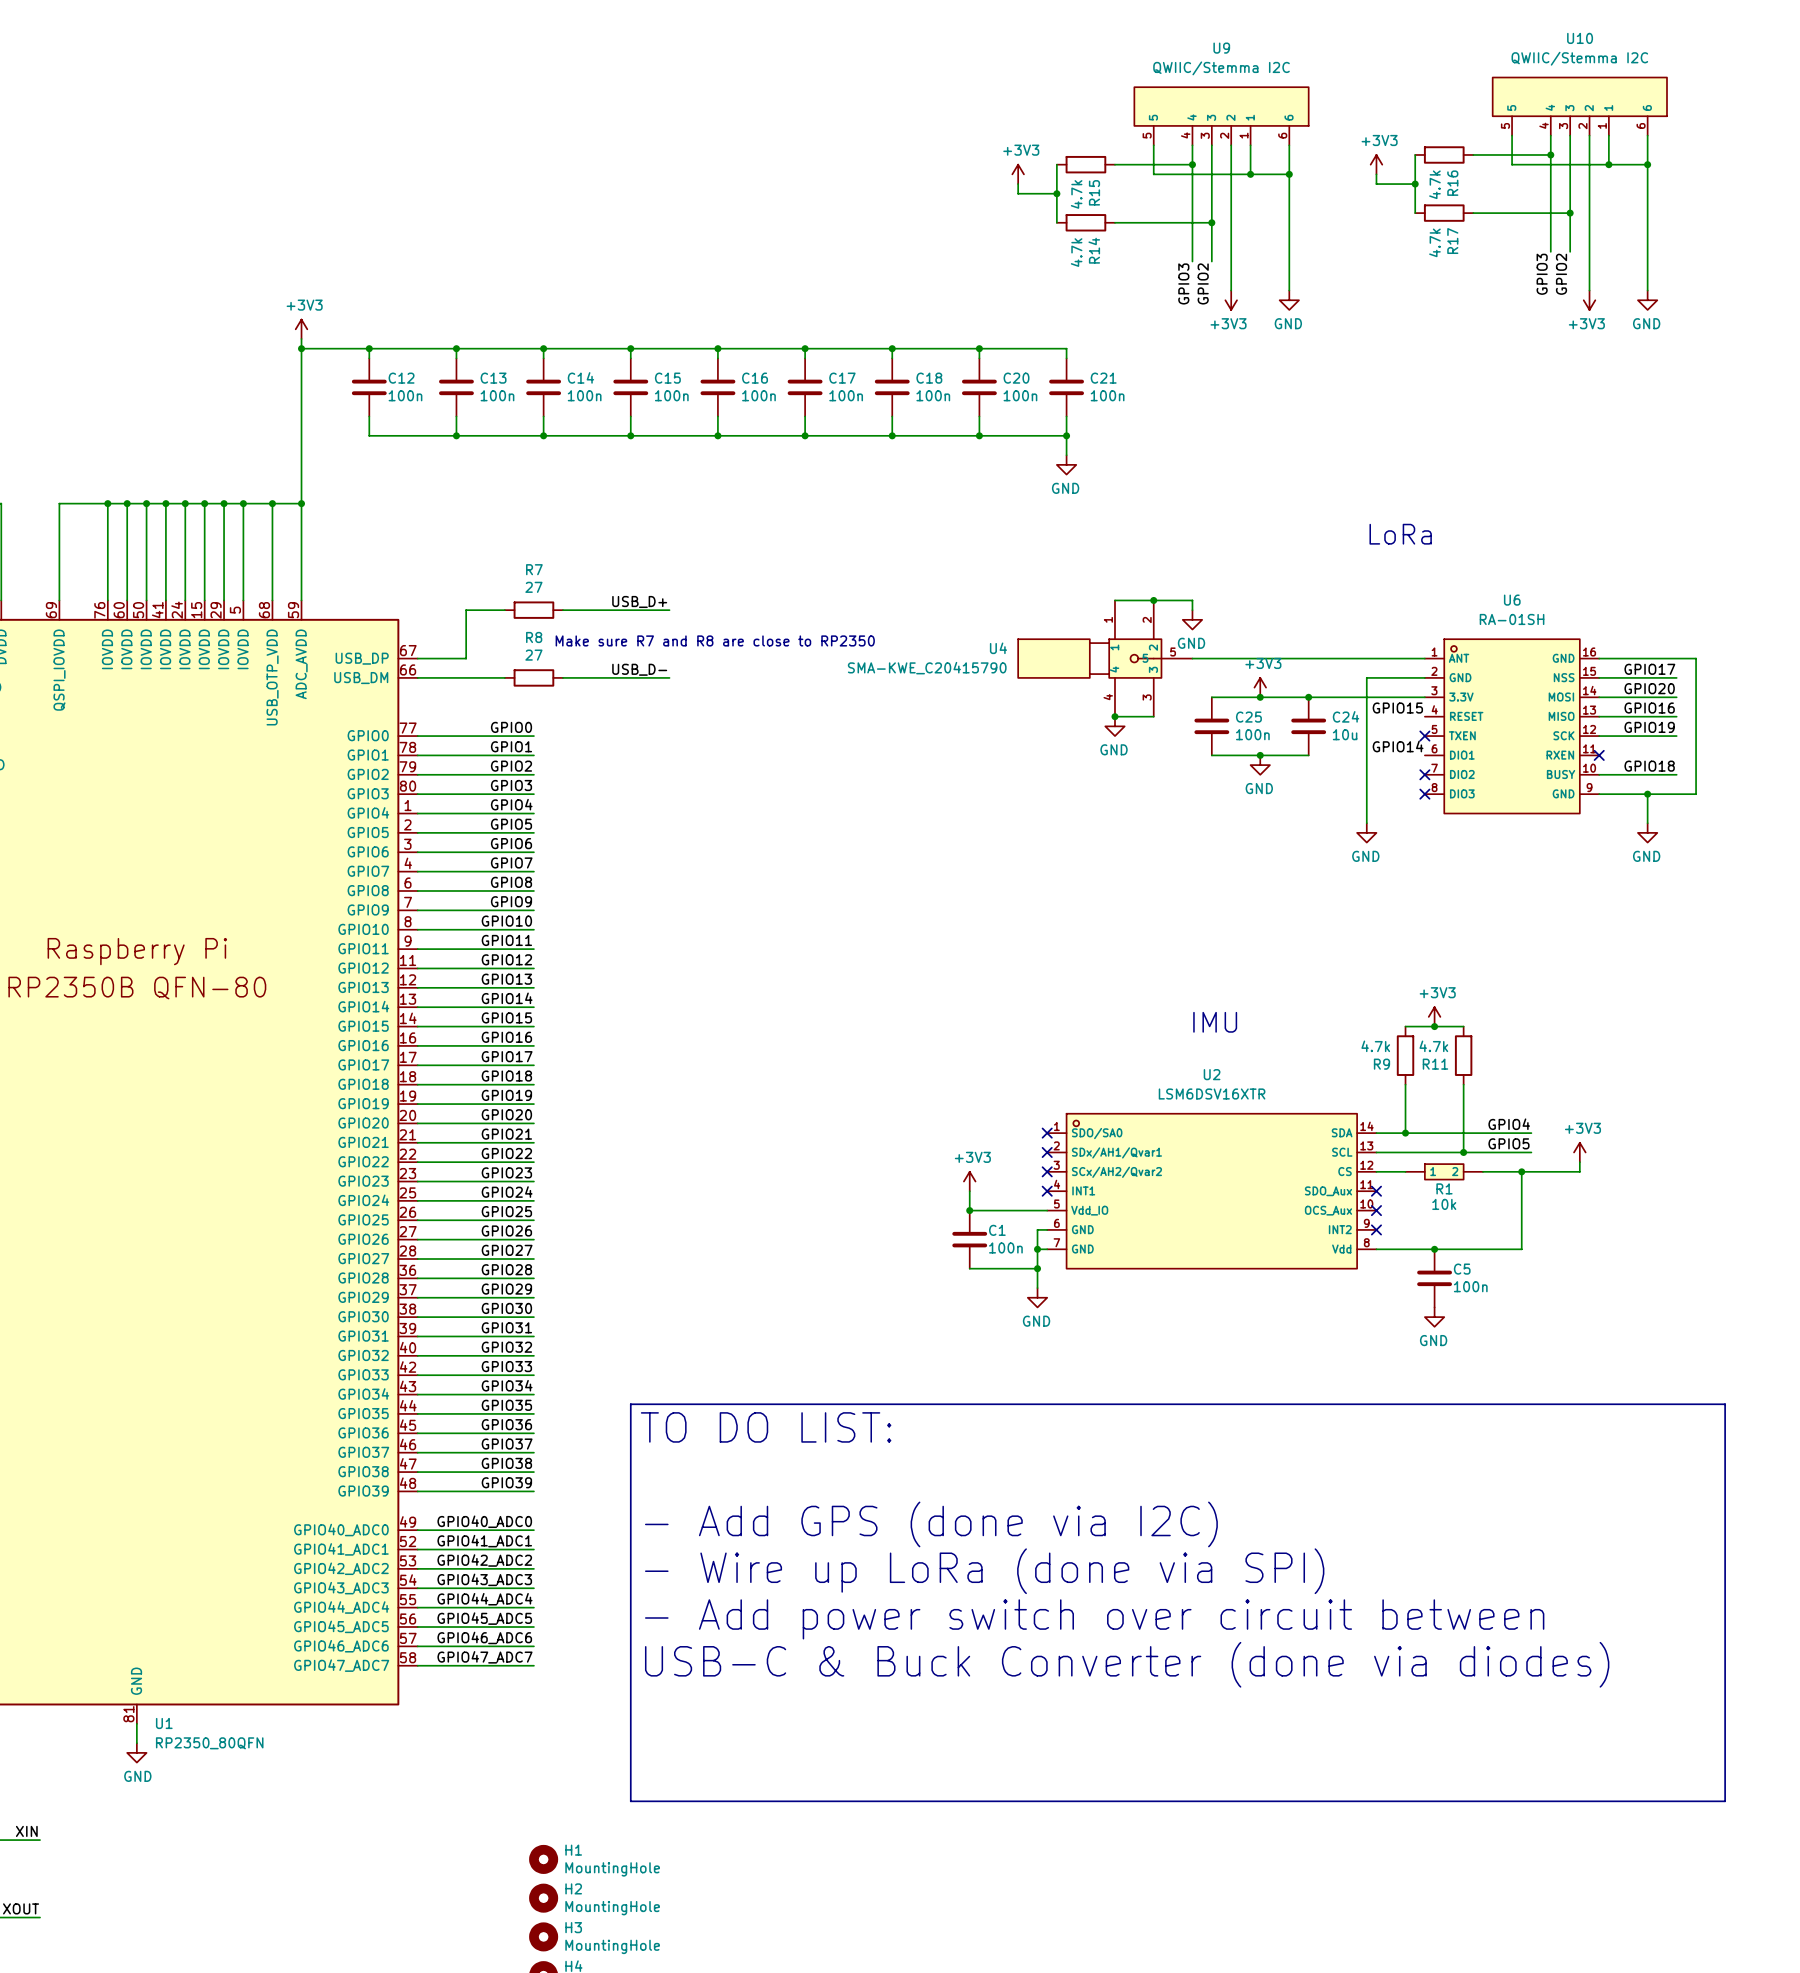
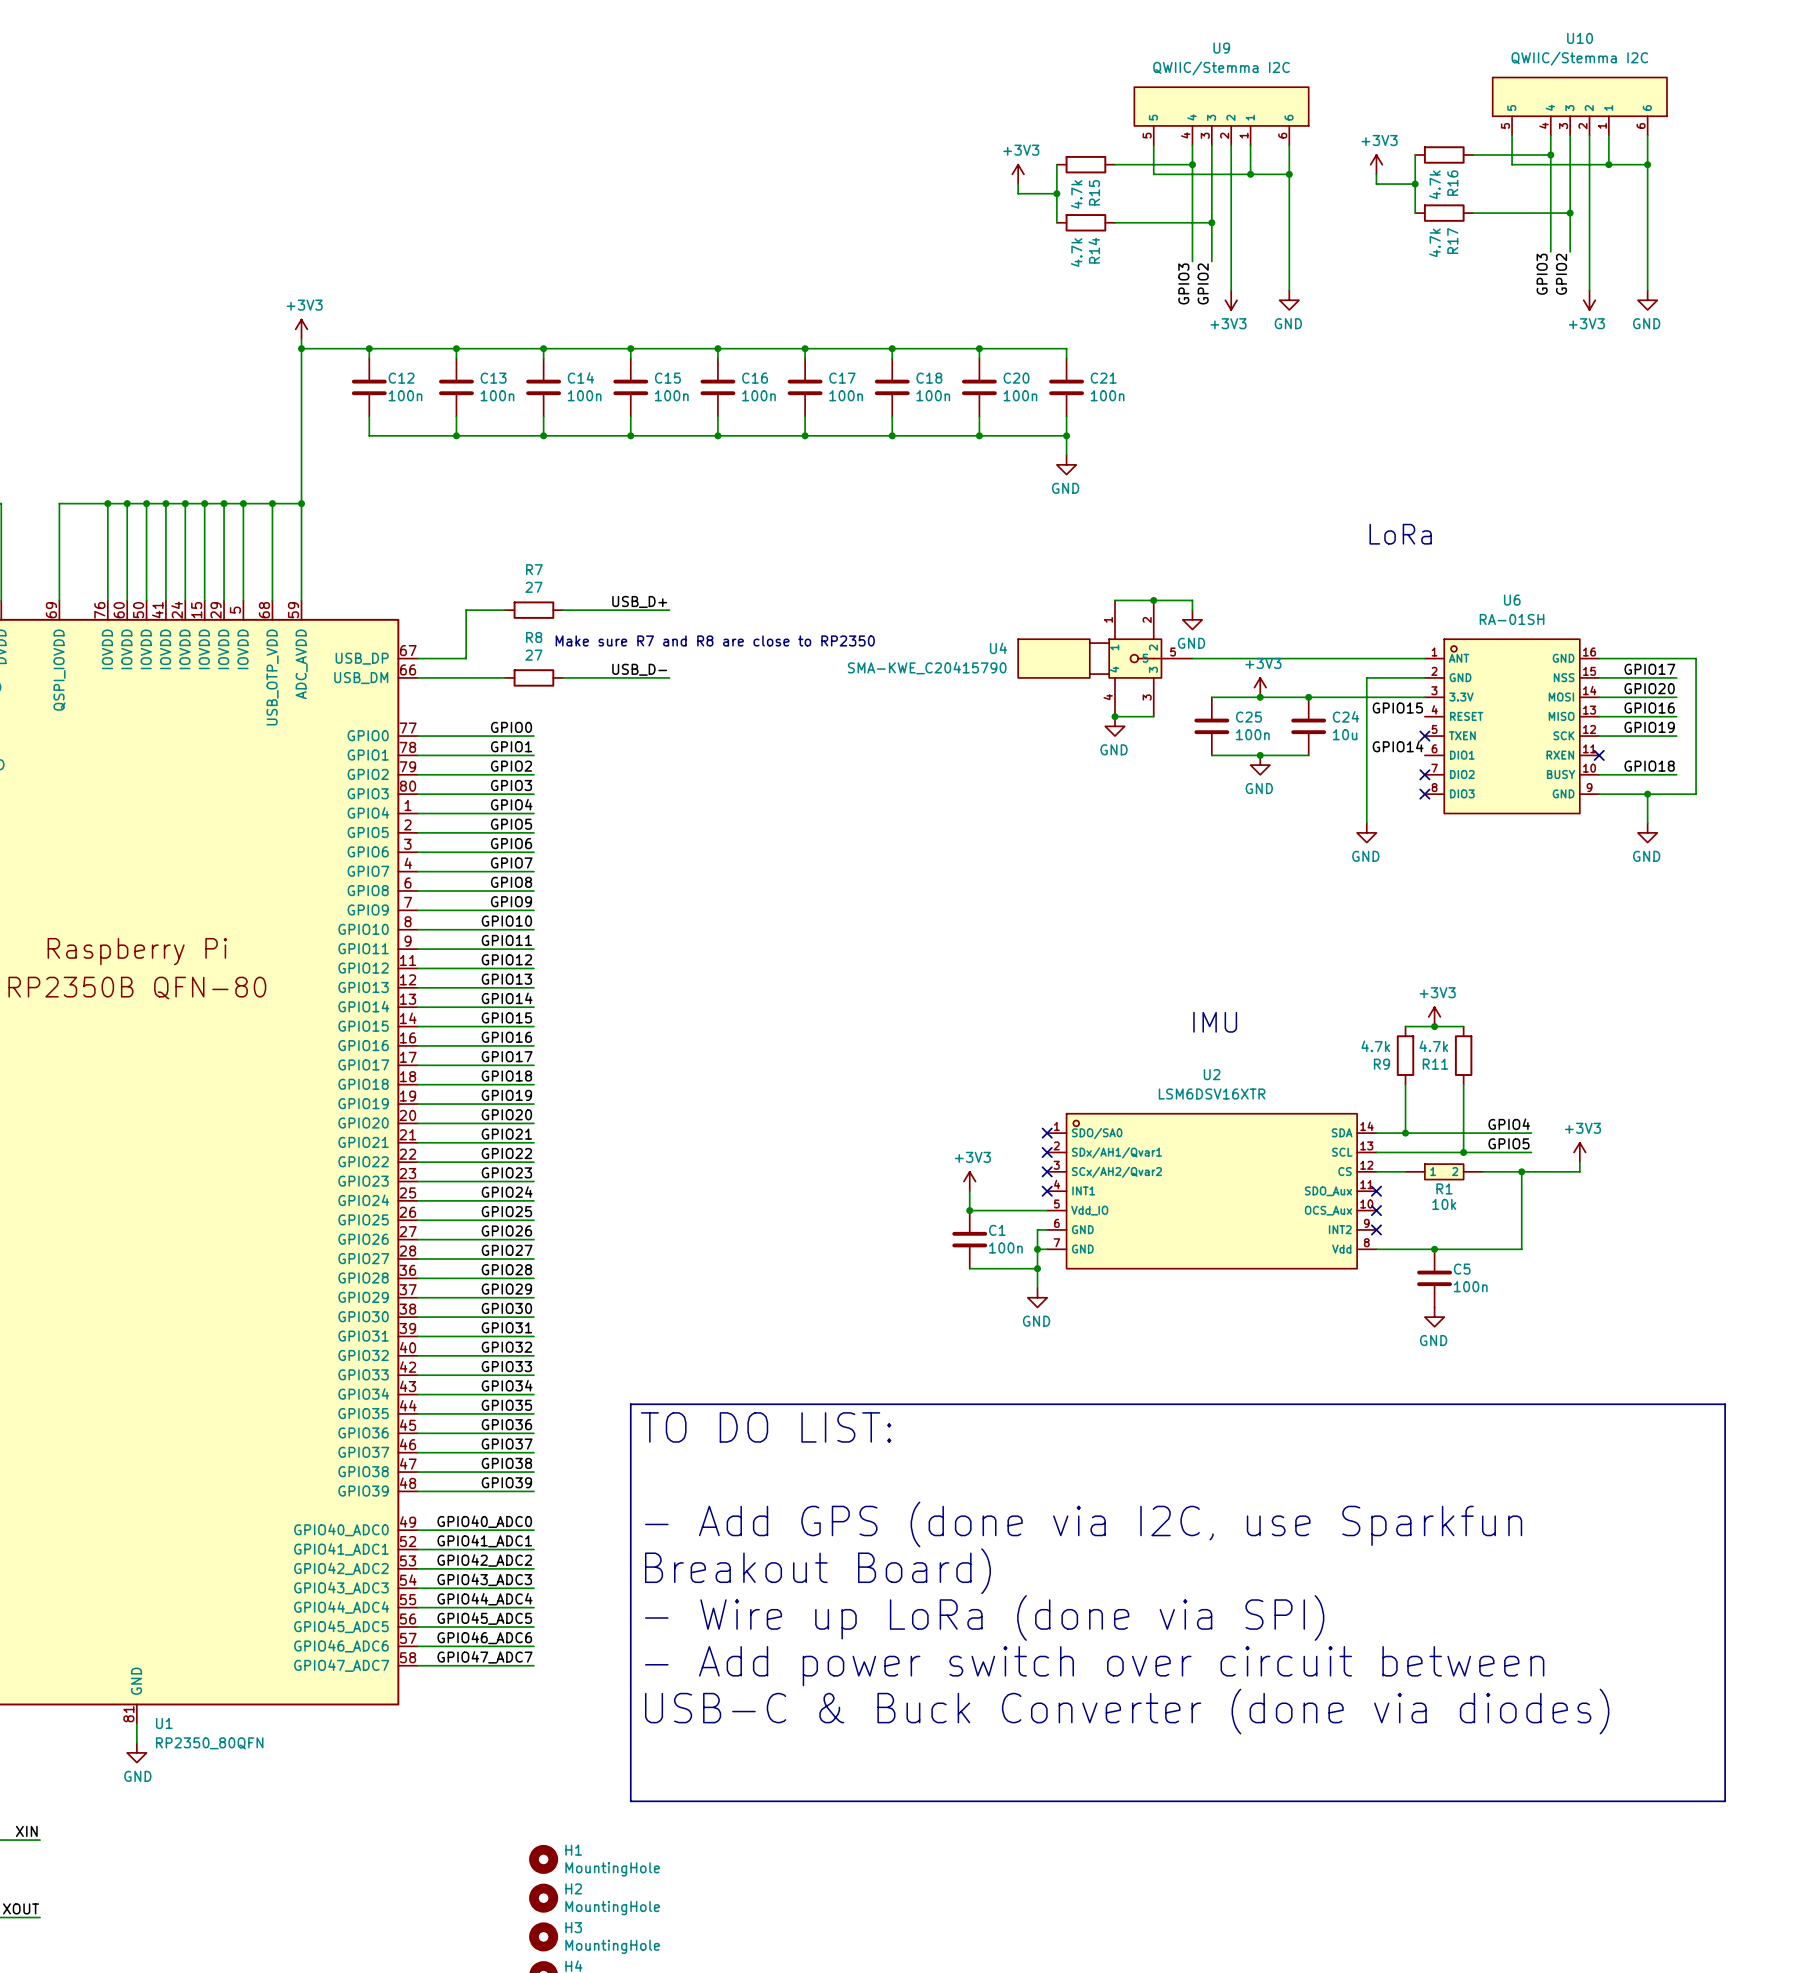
text: - Add GPS (done via I2C) (931, 1524) -> - Add GPS (done via I2C, use Sparkfun (1083, 1524)
text: - Wire up LoRa (done via SPI) (984, 1571) -> Breakout Board) (817, 1571)
text: - Add power switch over circuit between (1094, 1619) -> - Wire up LoRa (done via SPI) (984, 1617)
text: USB-C & Buck Converter (done via diodes) (1127, 1664) -> - Add power switch over circuit between (1094, 1666)
text: none -> USB-C & Buck Converter (done via diodes) (1127, 1711)

